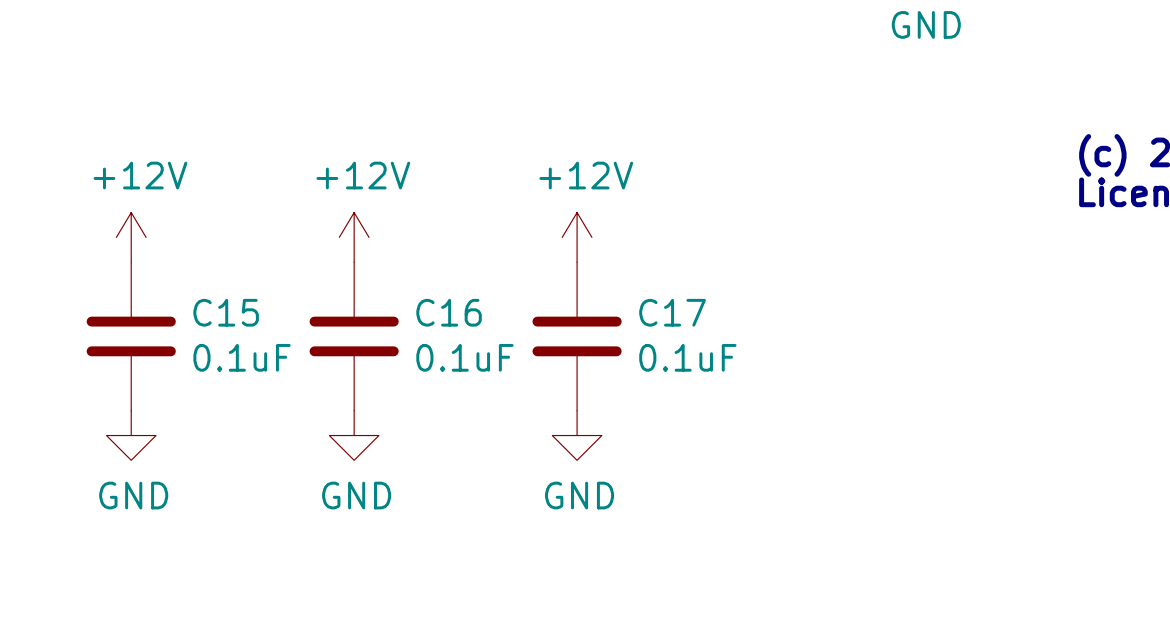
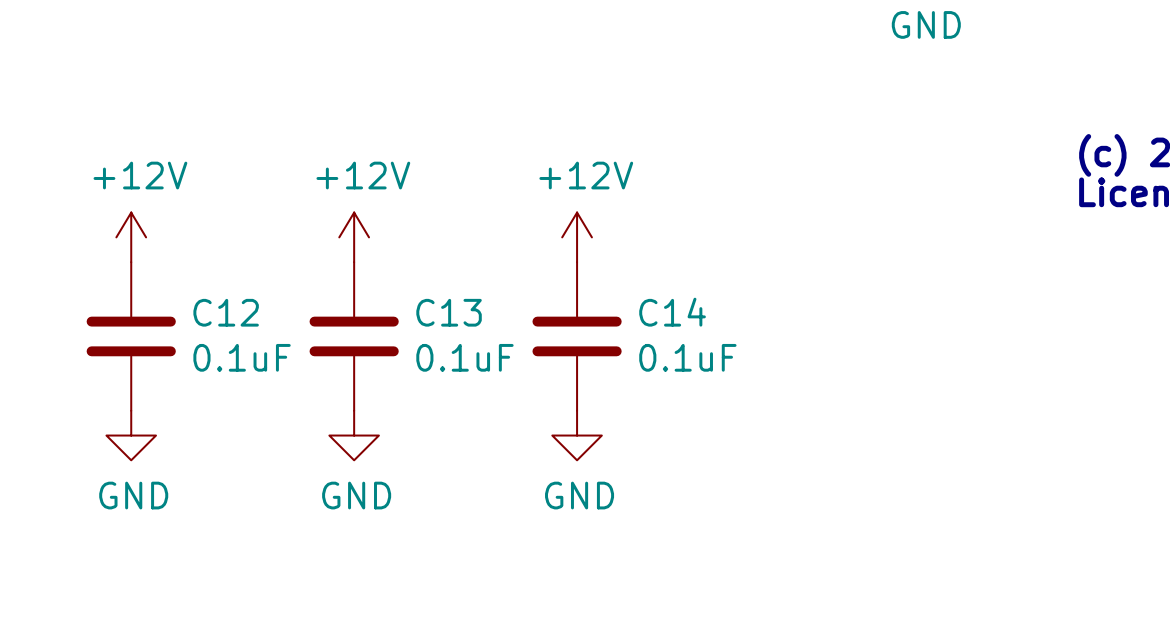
C15 name: C15 (226, 312) -> C12 (226, 312)
C16 name: C16 (449, 312) -> C13 (449, 312)
C17 name: C17 (672, 312) -> C14 (672, 312)

